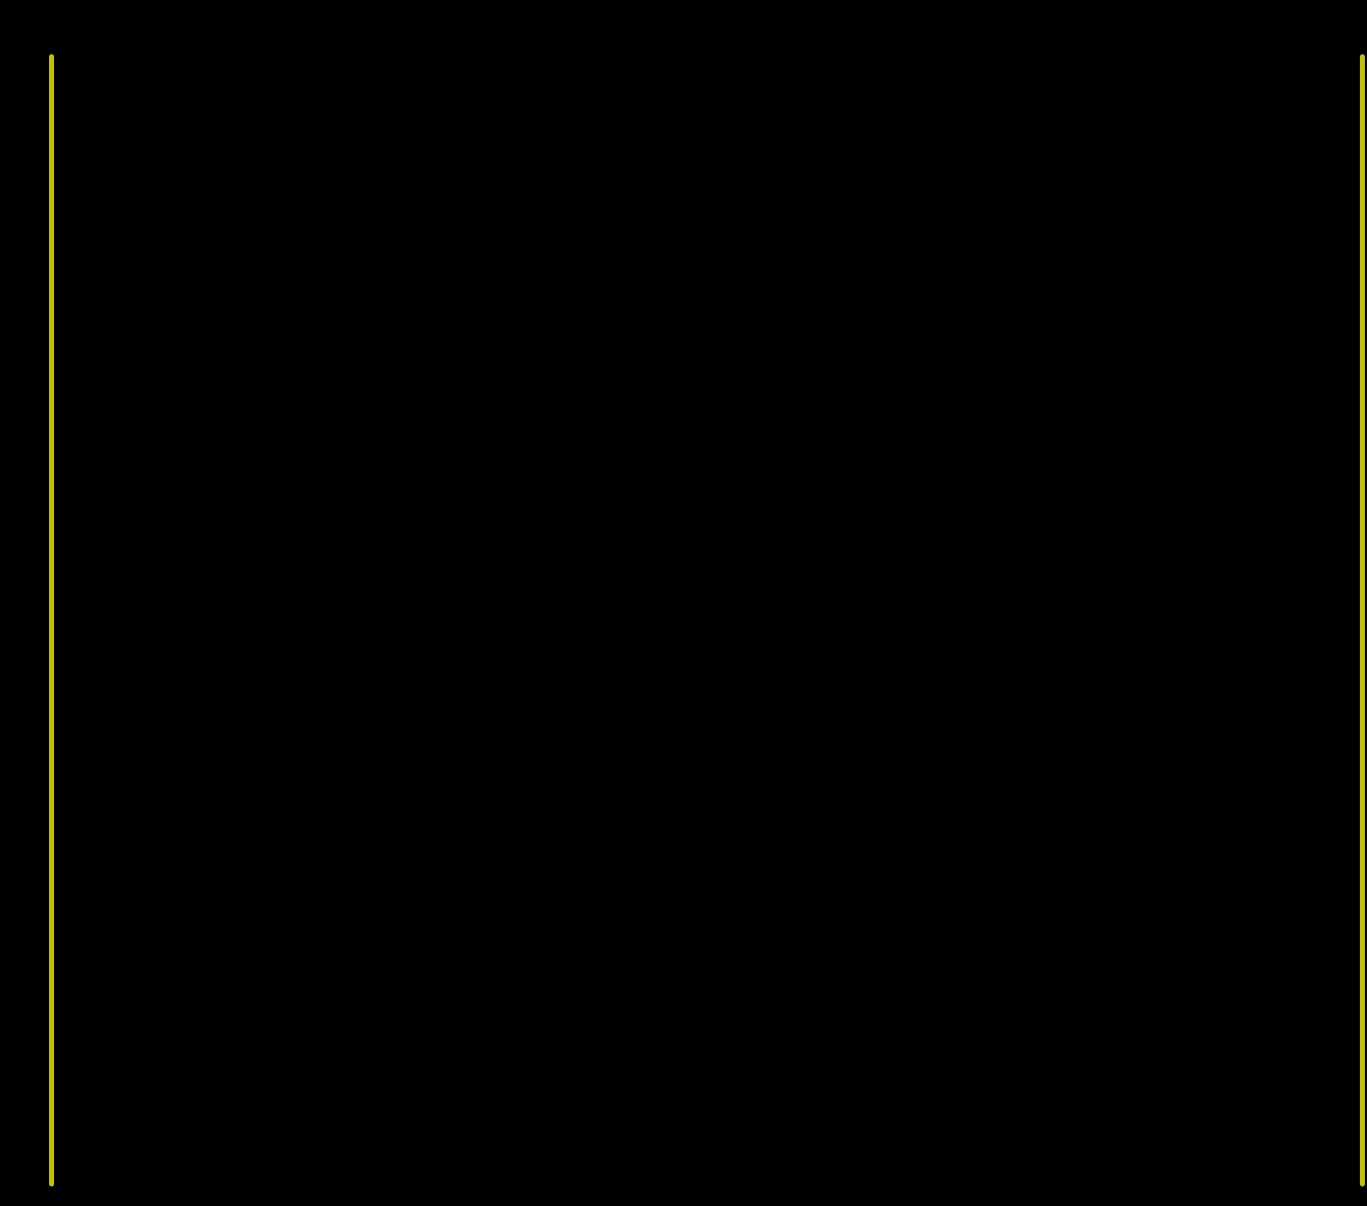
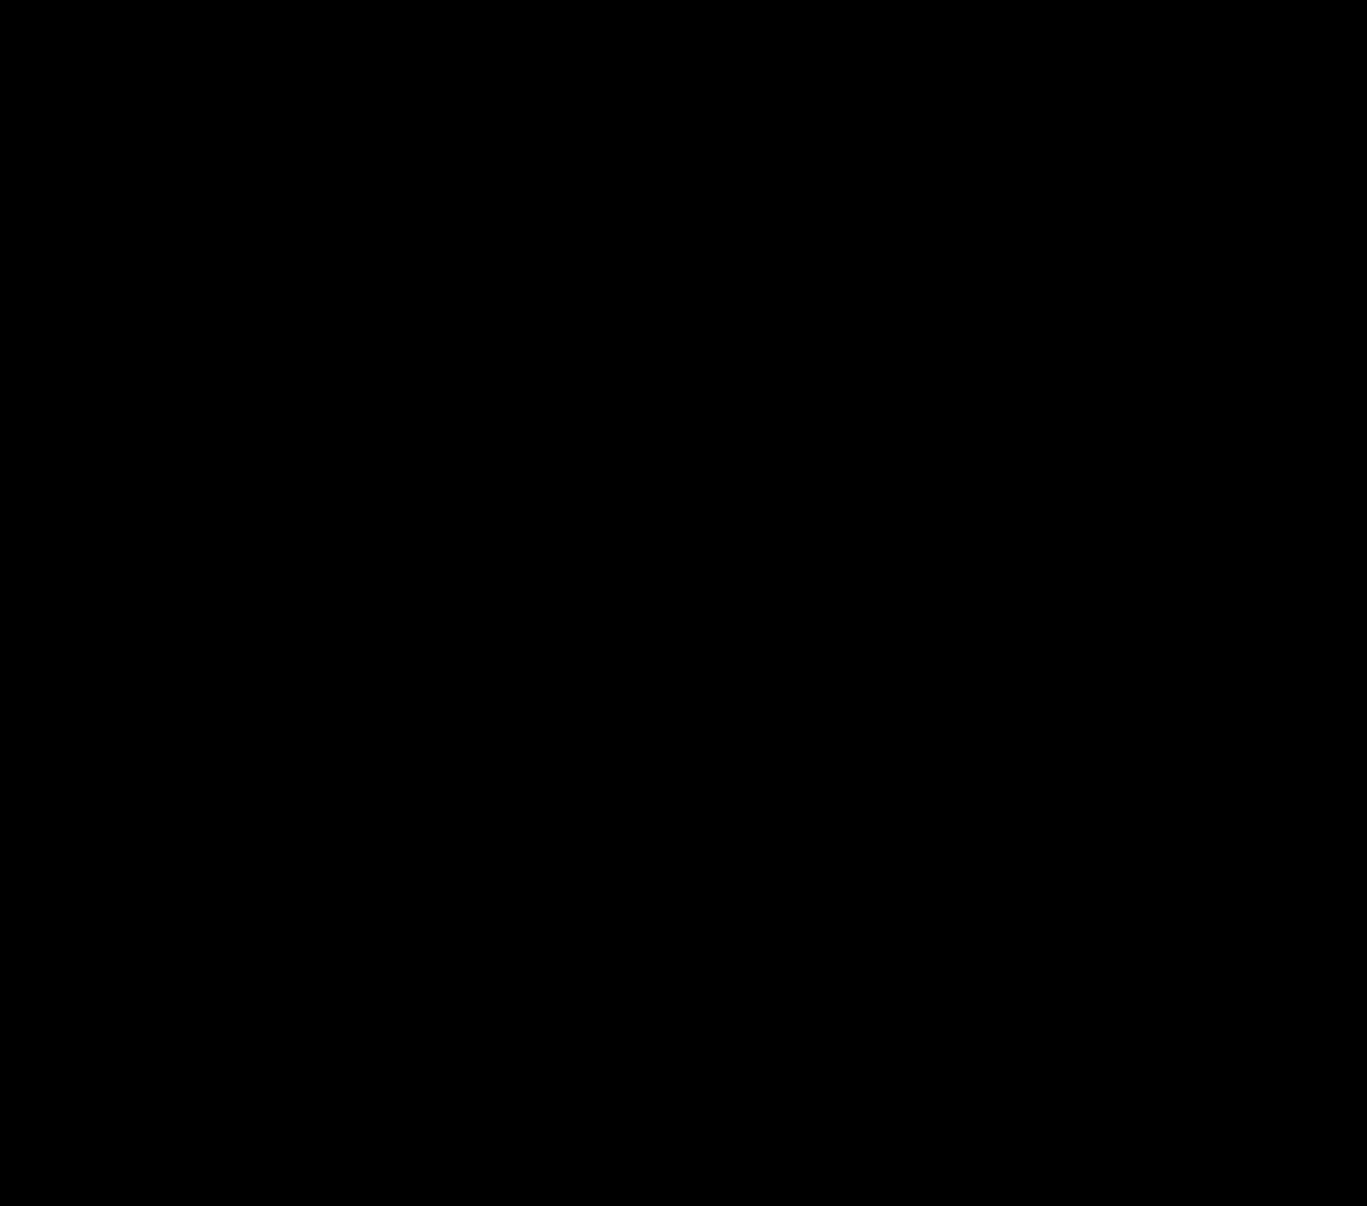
board edge: (51, 56) (51, 1184) -> none
board edge: (1362, 56) (1362, 1184) -> none

